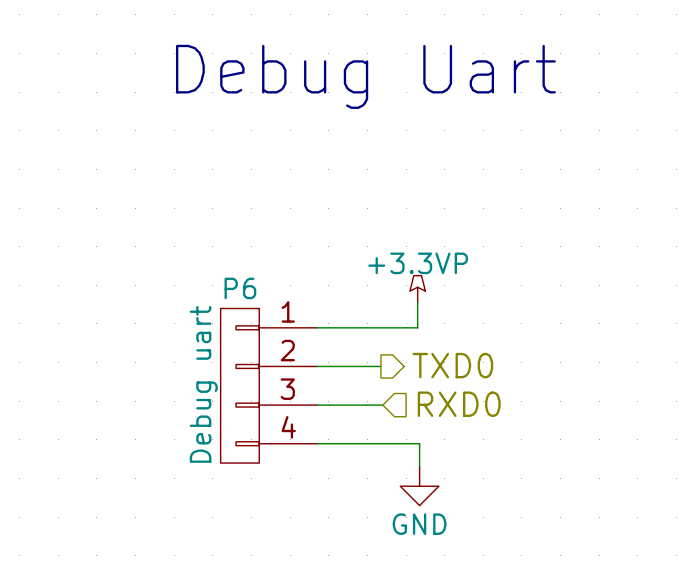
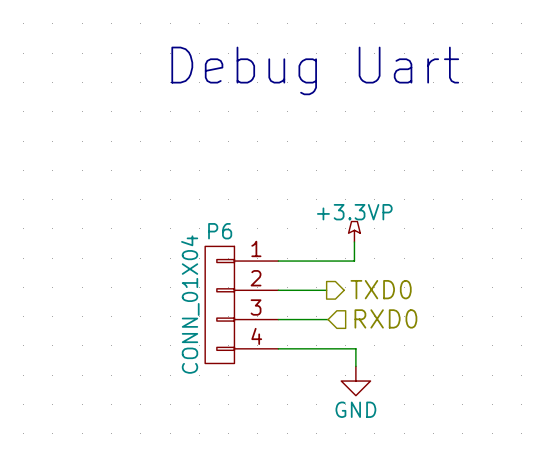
P6 value: Debug uart (203, 384) -> CONN_01X04 (190, 304)

